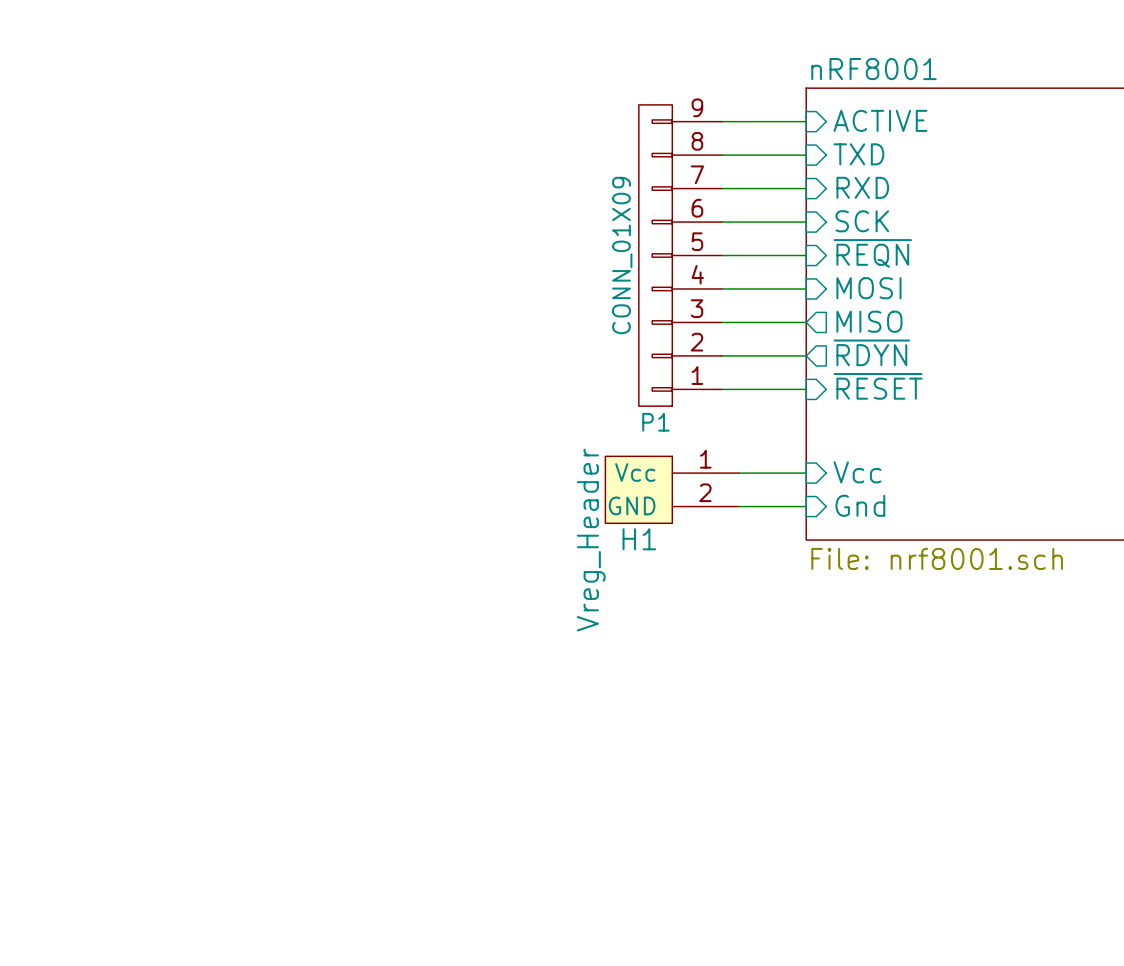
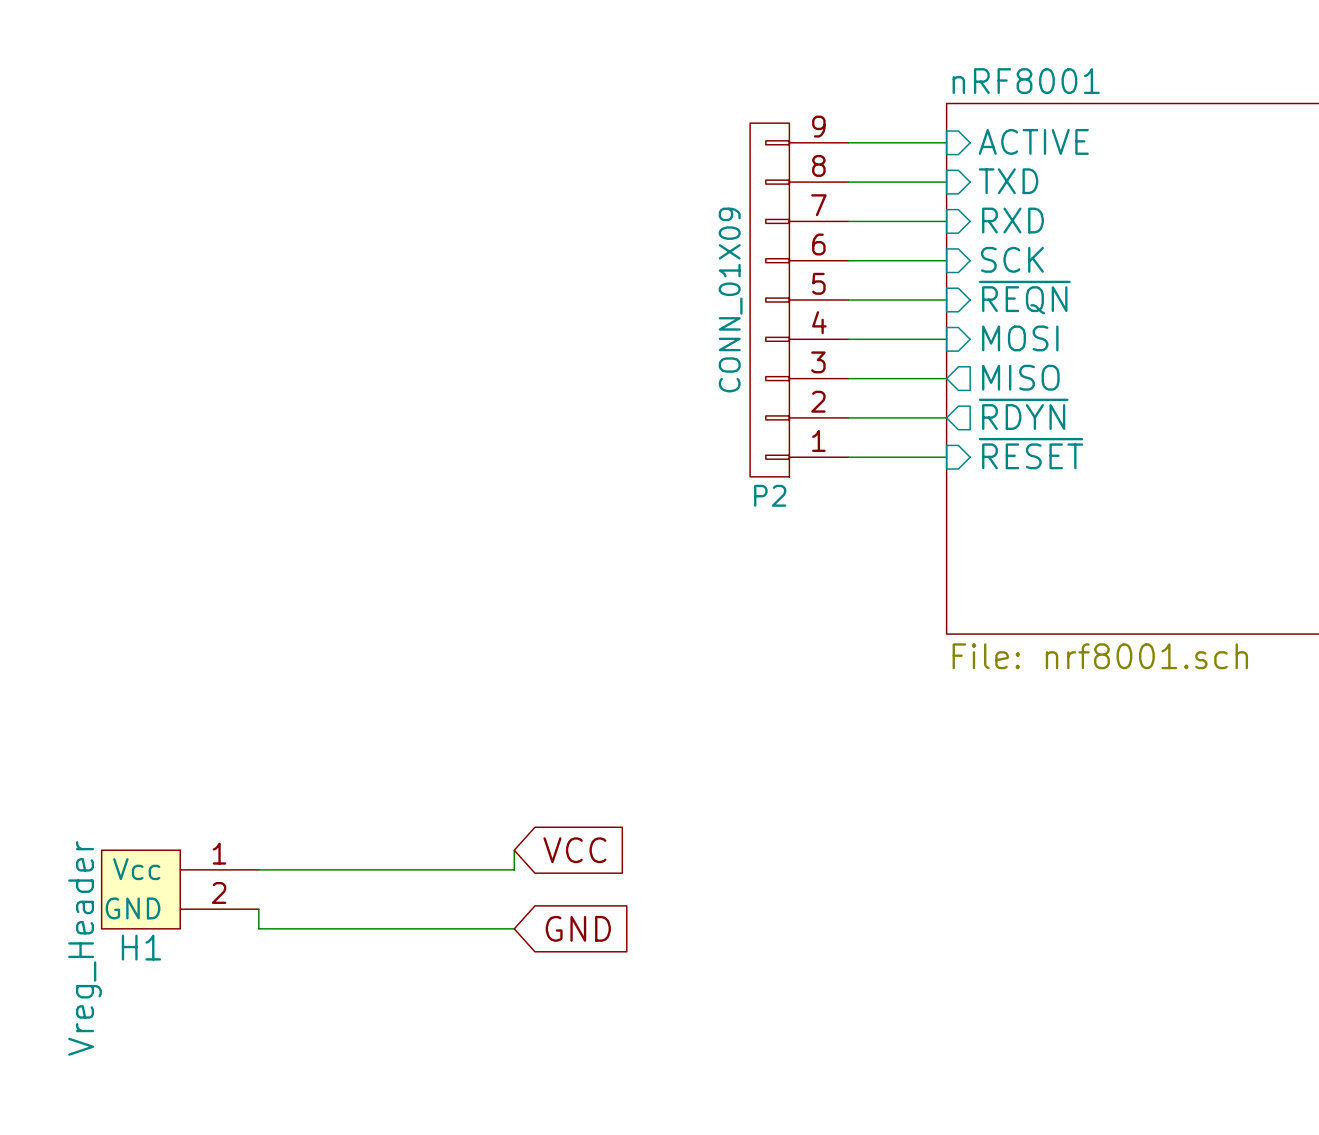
P1 name: P1 (655, 422) -> P2 (770, 495)
sheet pin: Vcc (857, 472) -> none
wire: (739, 473) (806, 473) -> none
H1 position: (672, 489) -> (180, 889)
sheet pin: Gnd (860, 505) -> none
wire: (739, 506) (806, 506) -> none
wire: none -> (514, 850) (514, 869) (258, 869)
global label: none -> VCC (574, 850)
wire: none -> (258, 909) (258, 928) (514, 928)
global label: none -> GND (578, 928)

